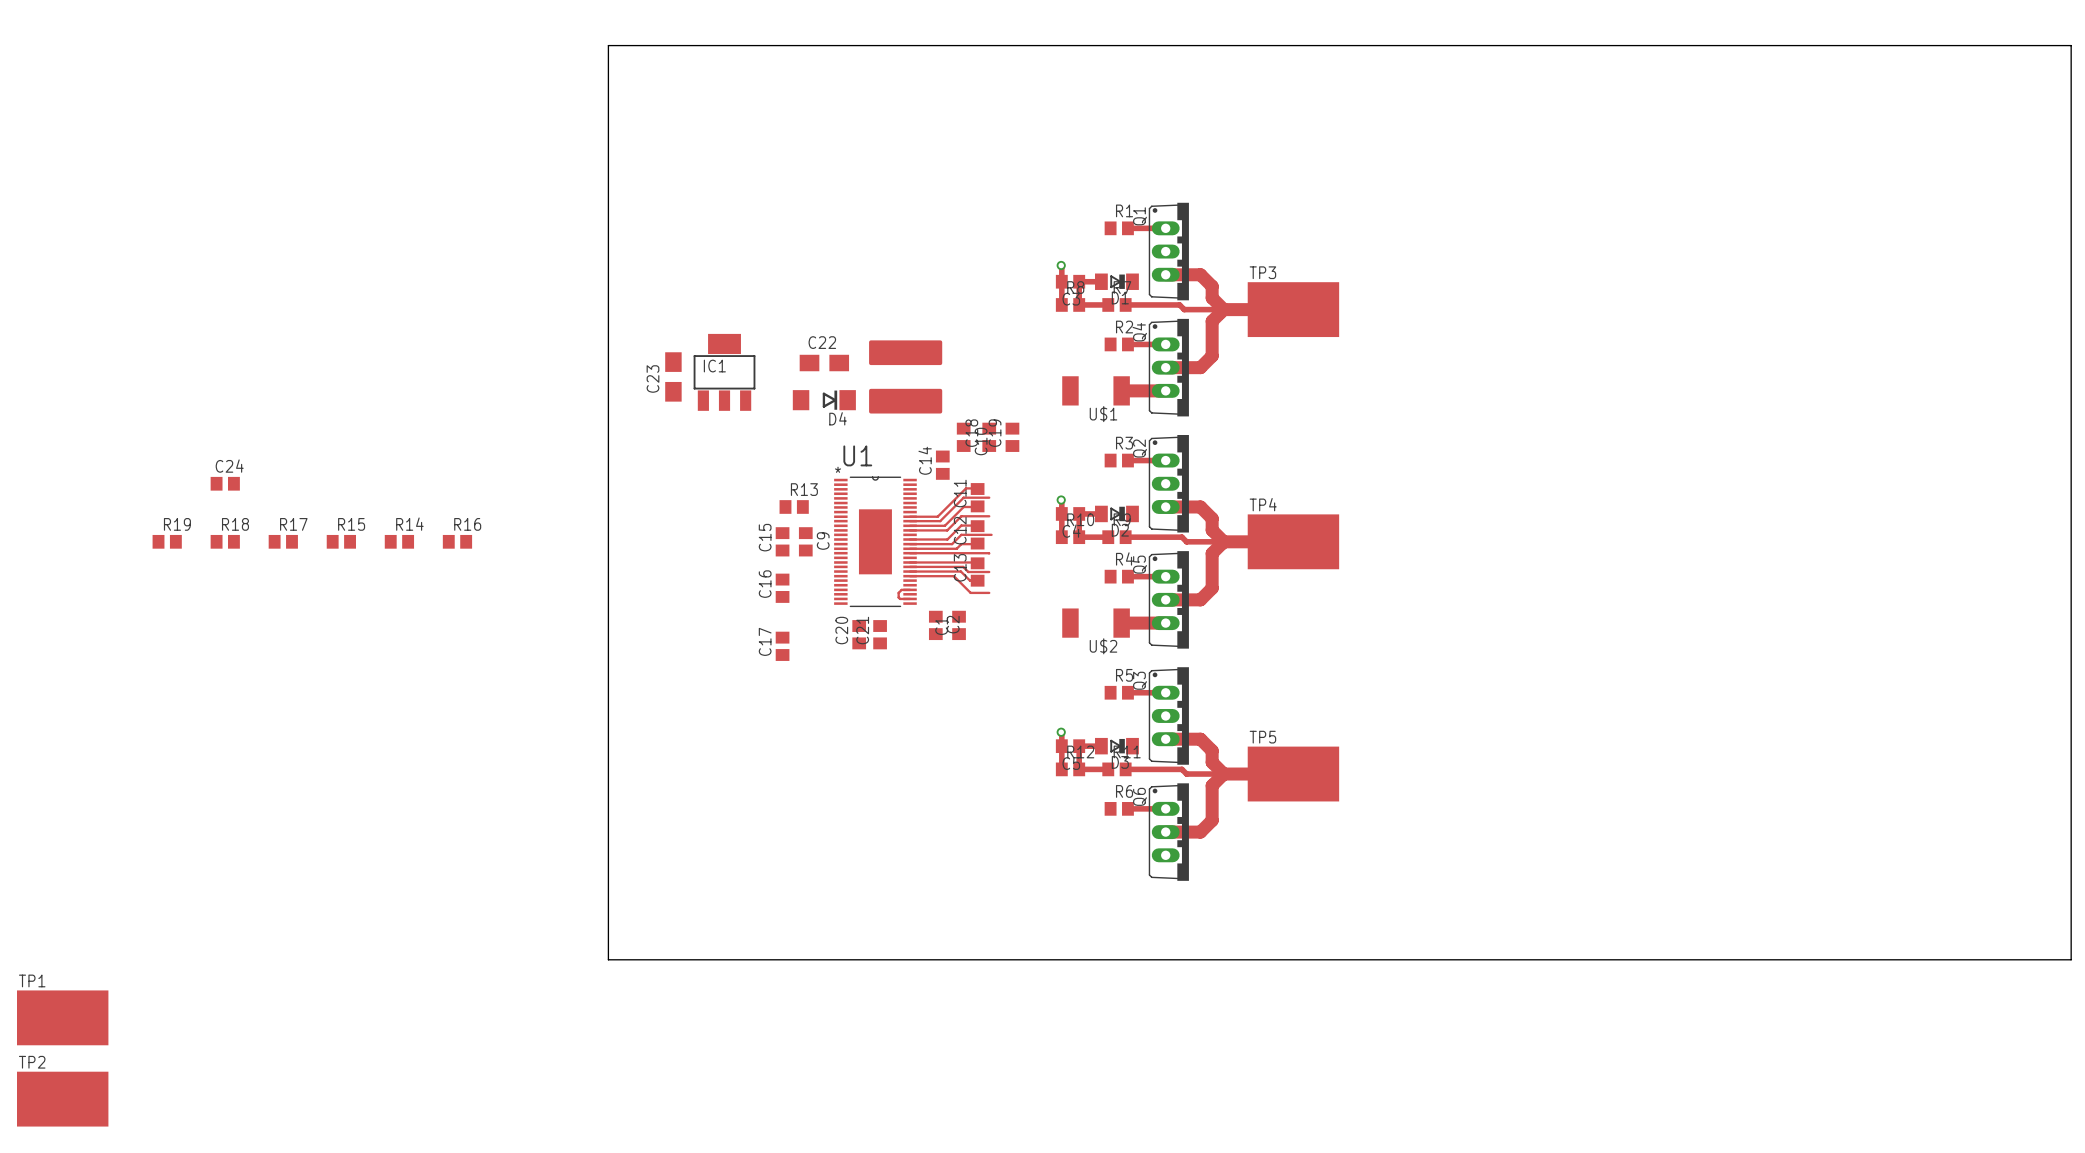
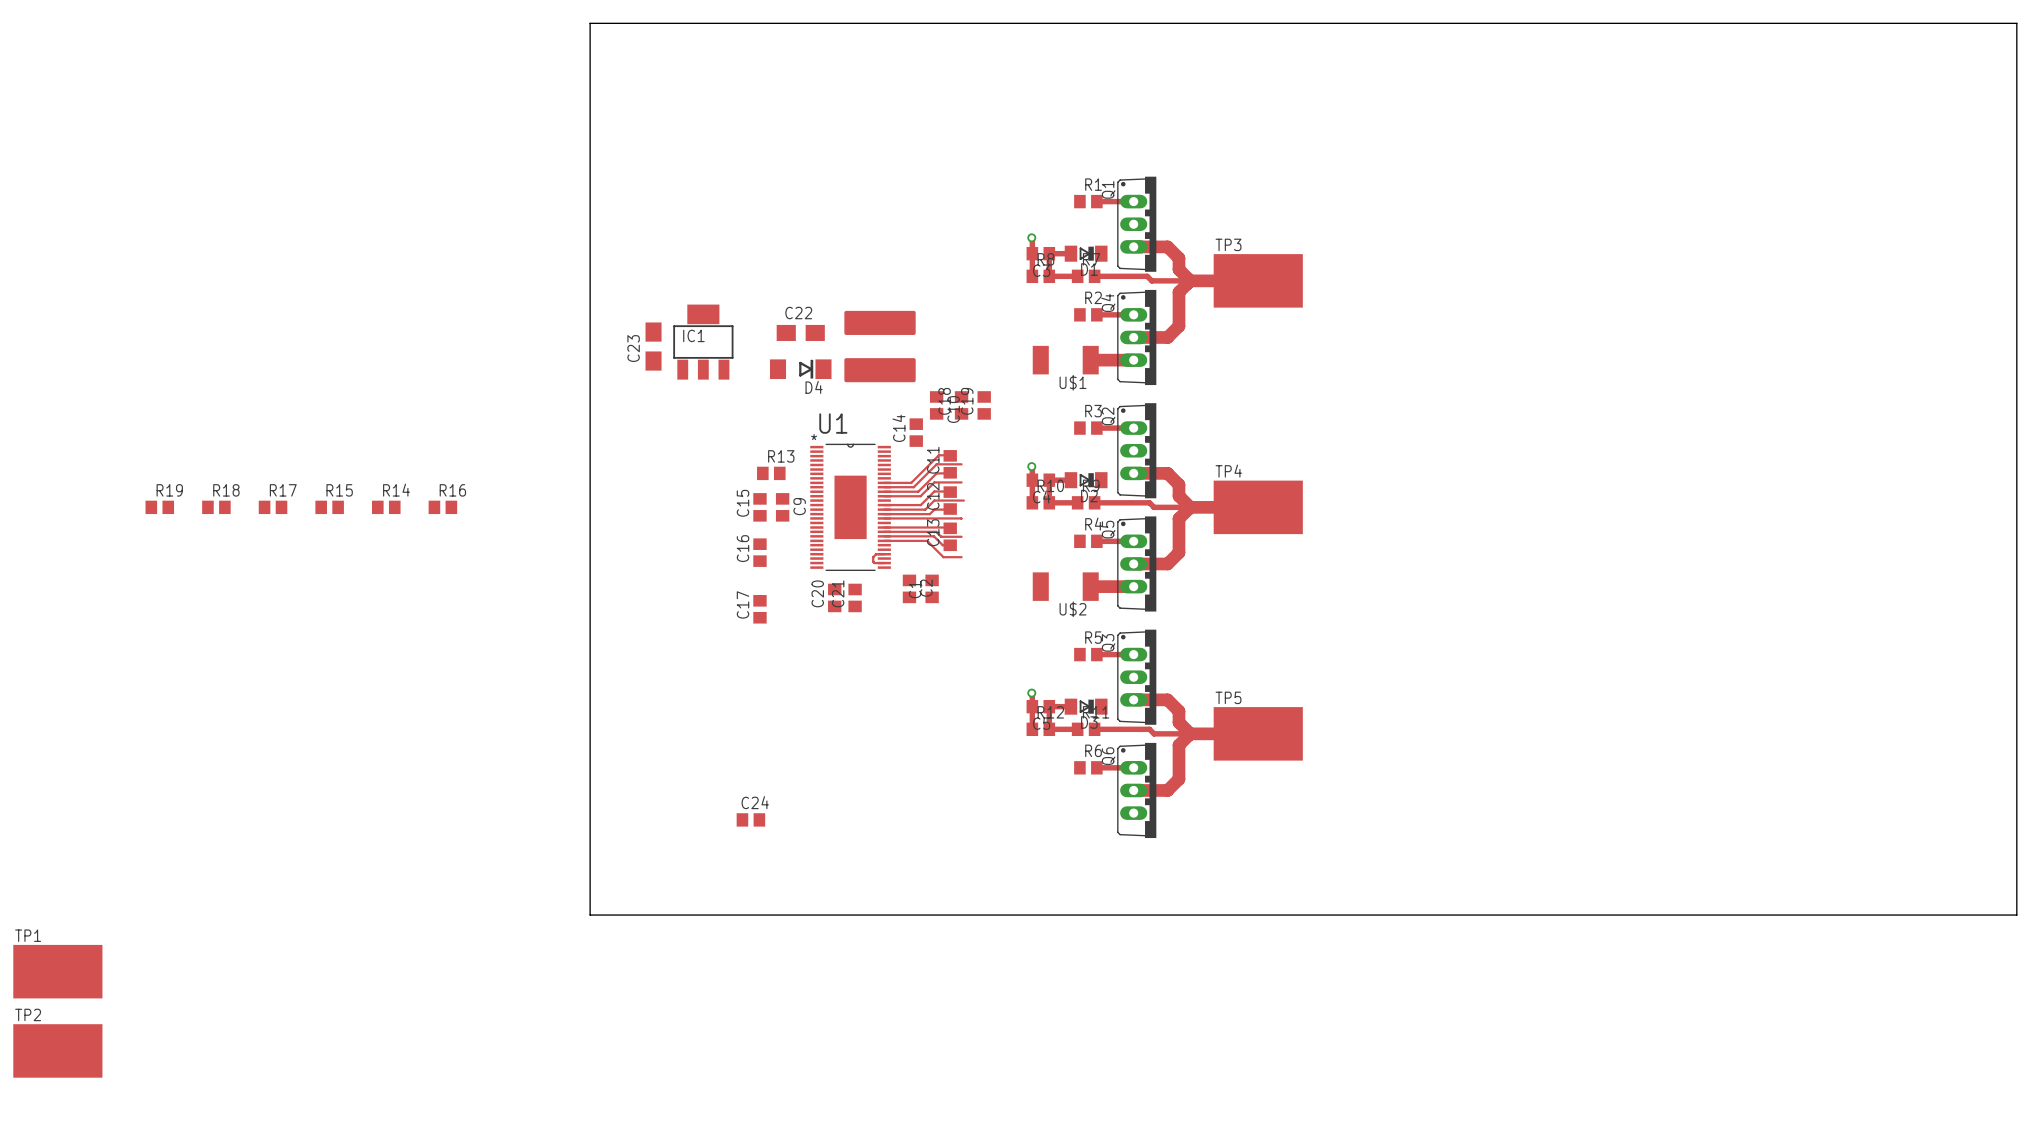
C24 position: (225, 483) -> (750, 819)

